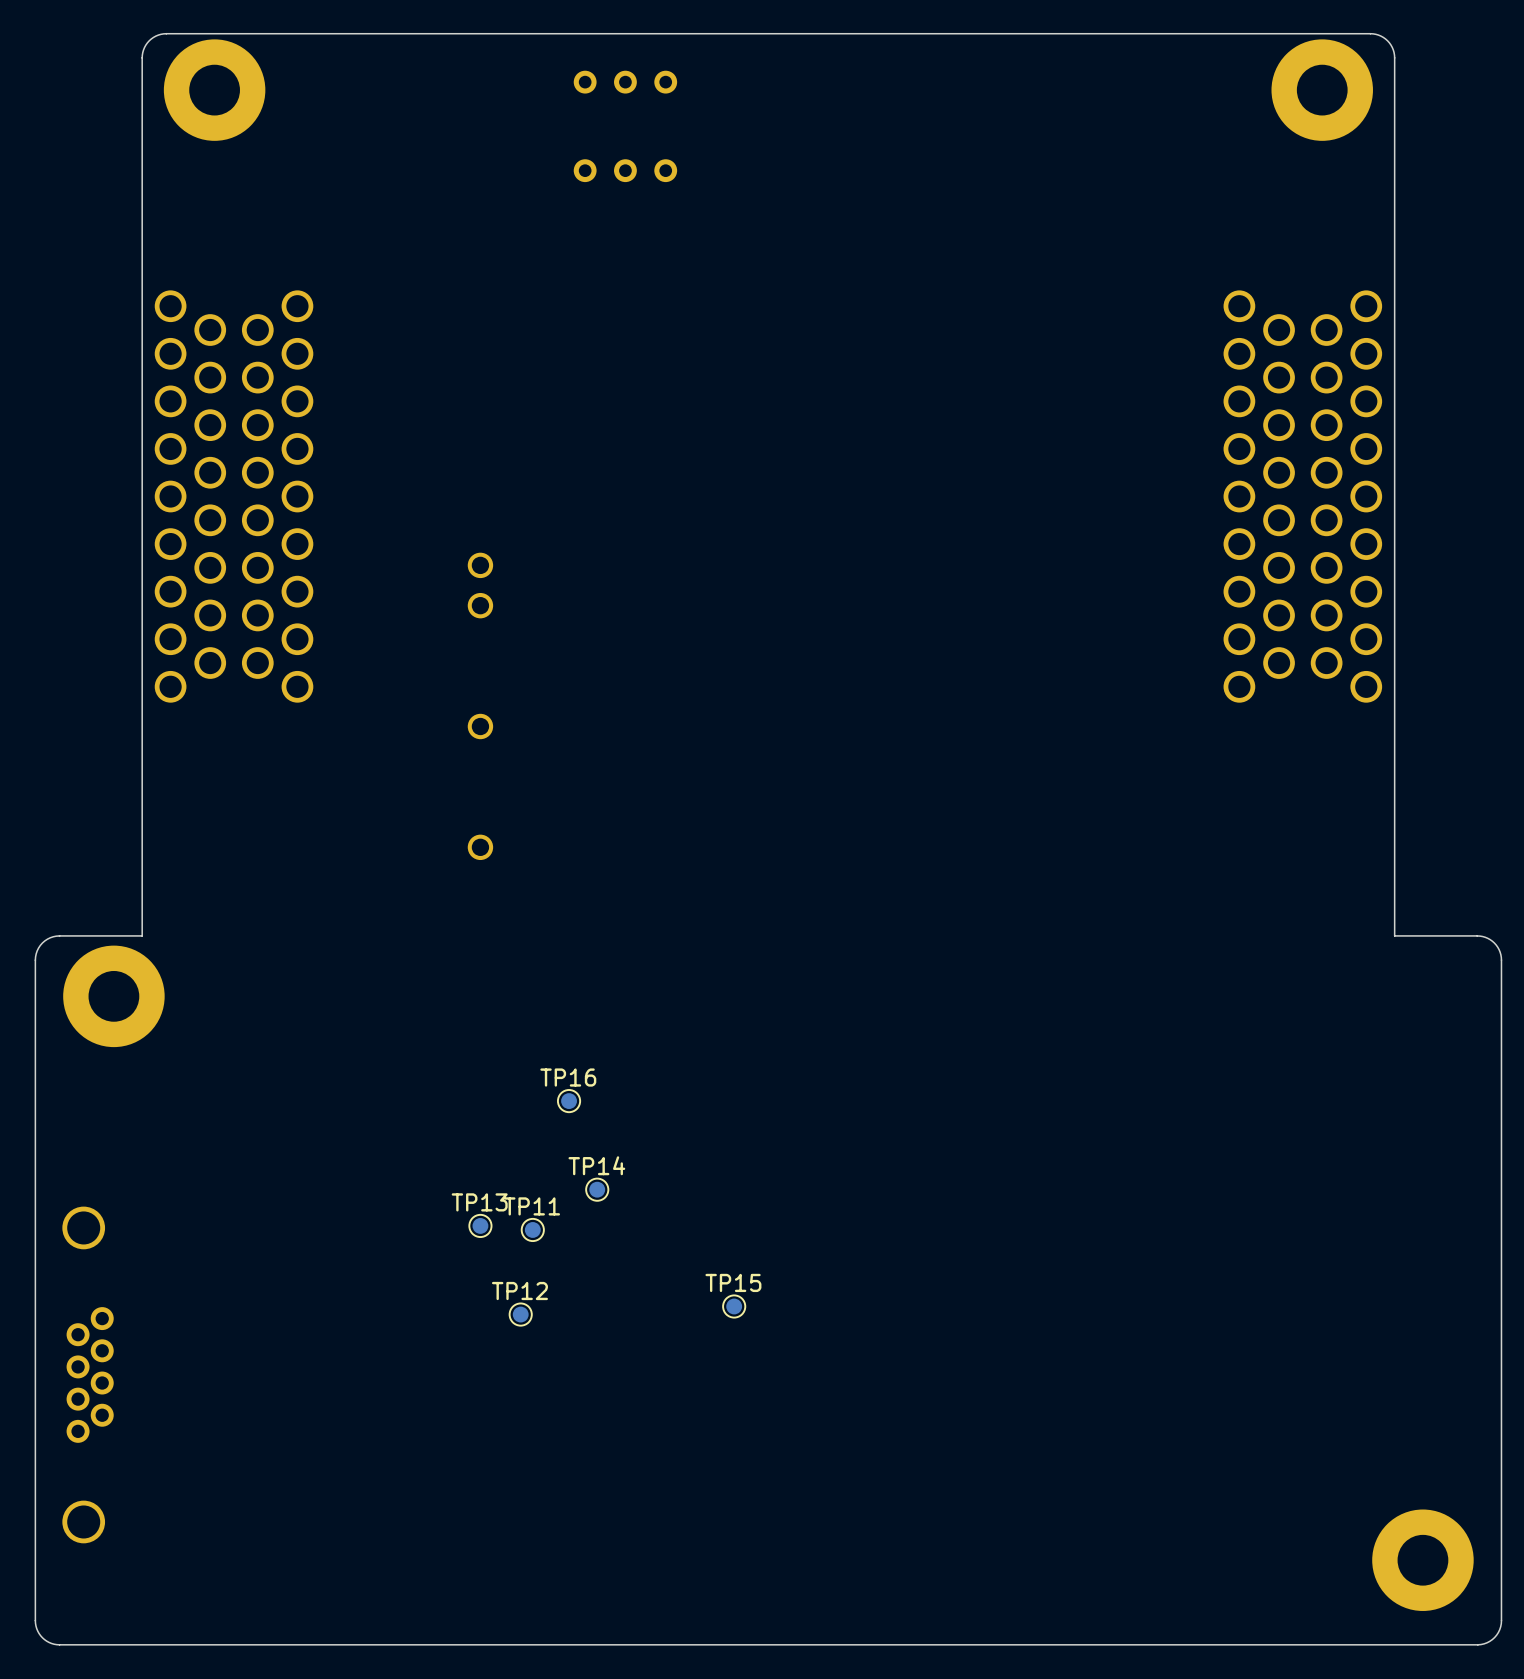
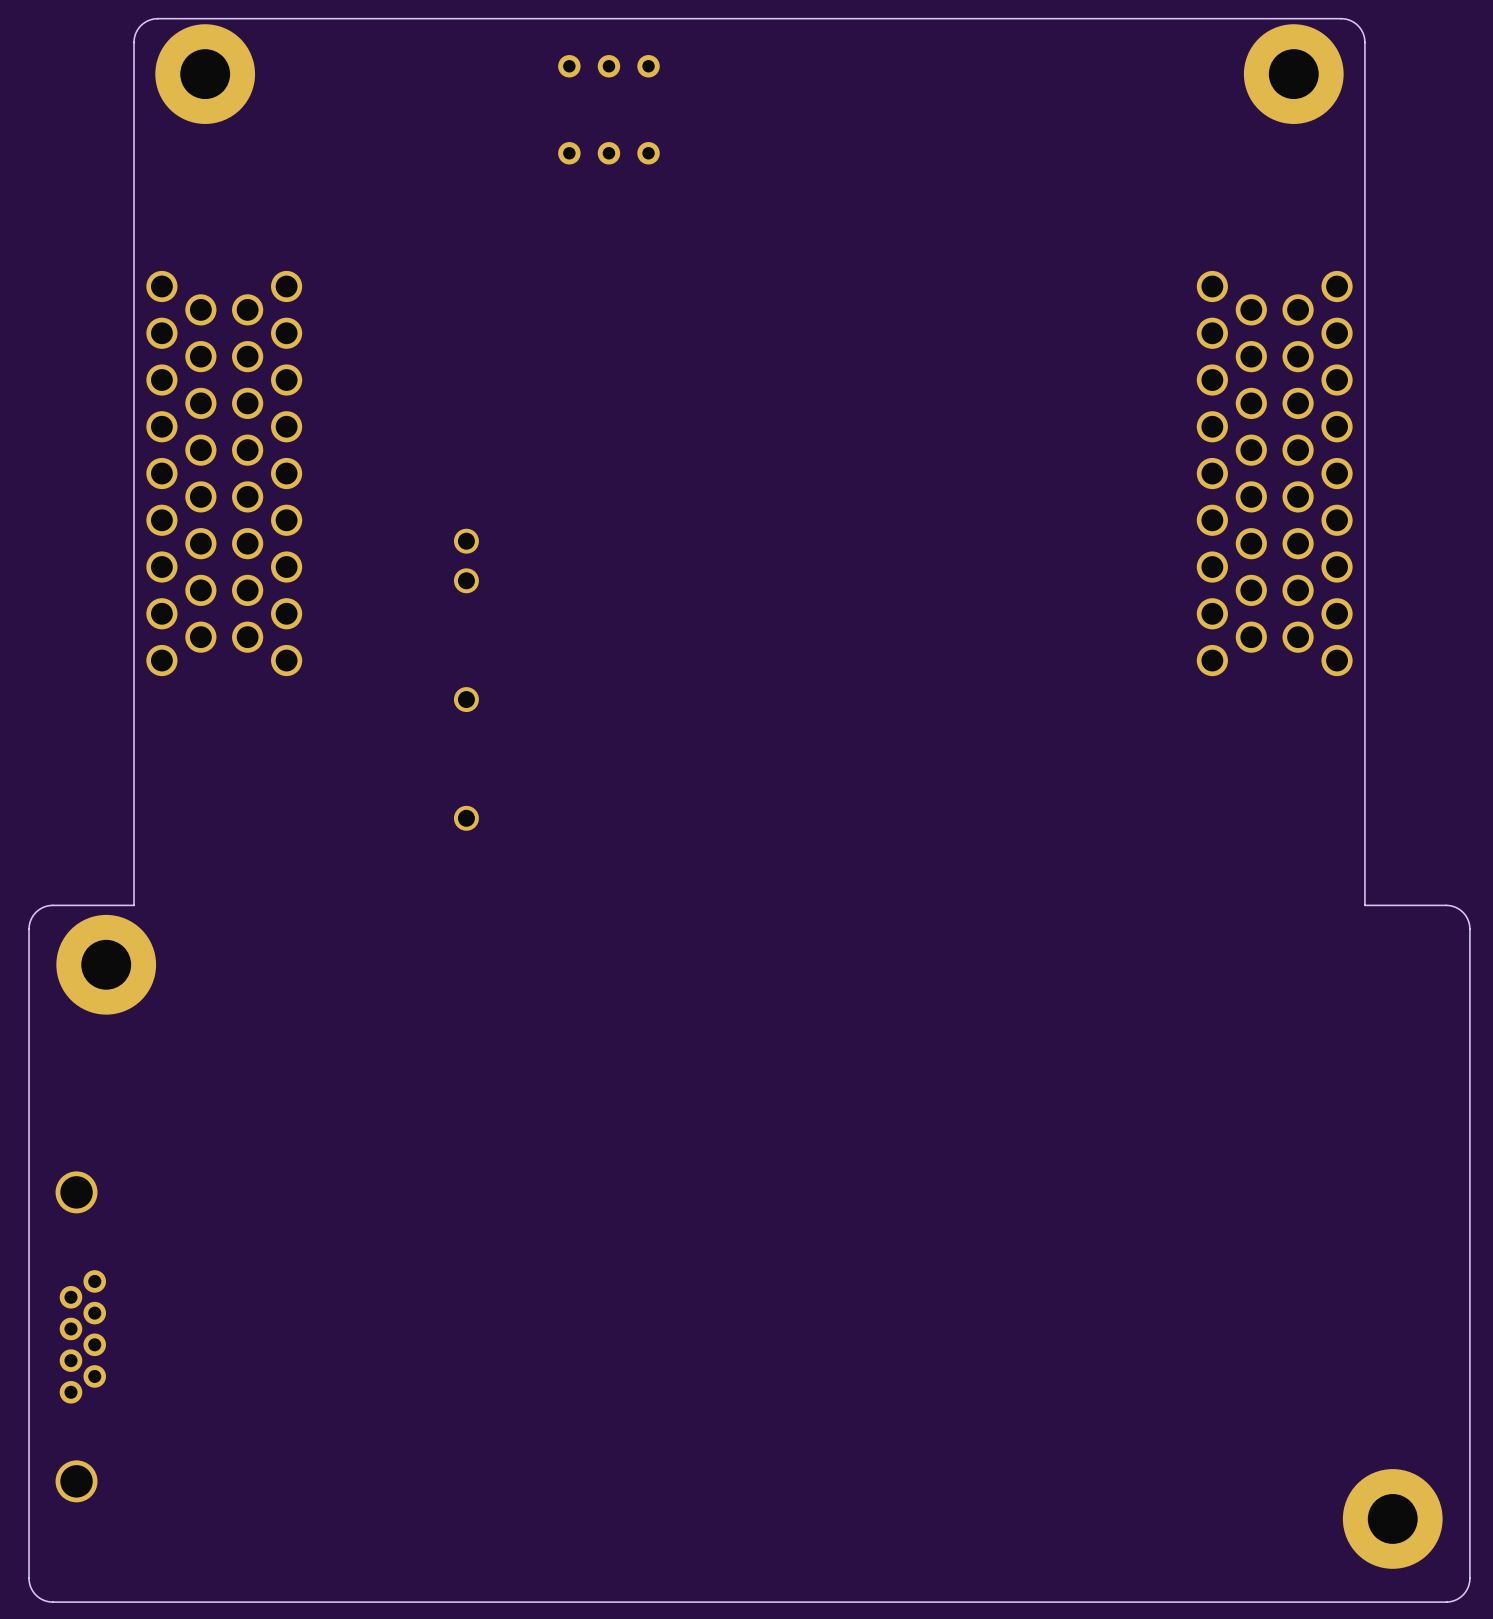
TP16: (569, 1101) -> none
TP14: (597, 1189) -> none
TP13: (480, 1225) -> none
TP11: (532, 1229) -> none
TP15: (734, 1306) -> none
TP12: (520, 1314) -> none

